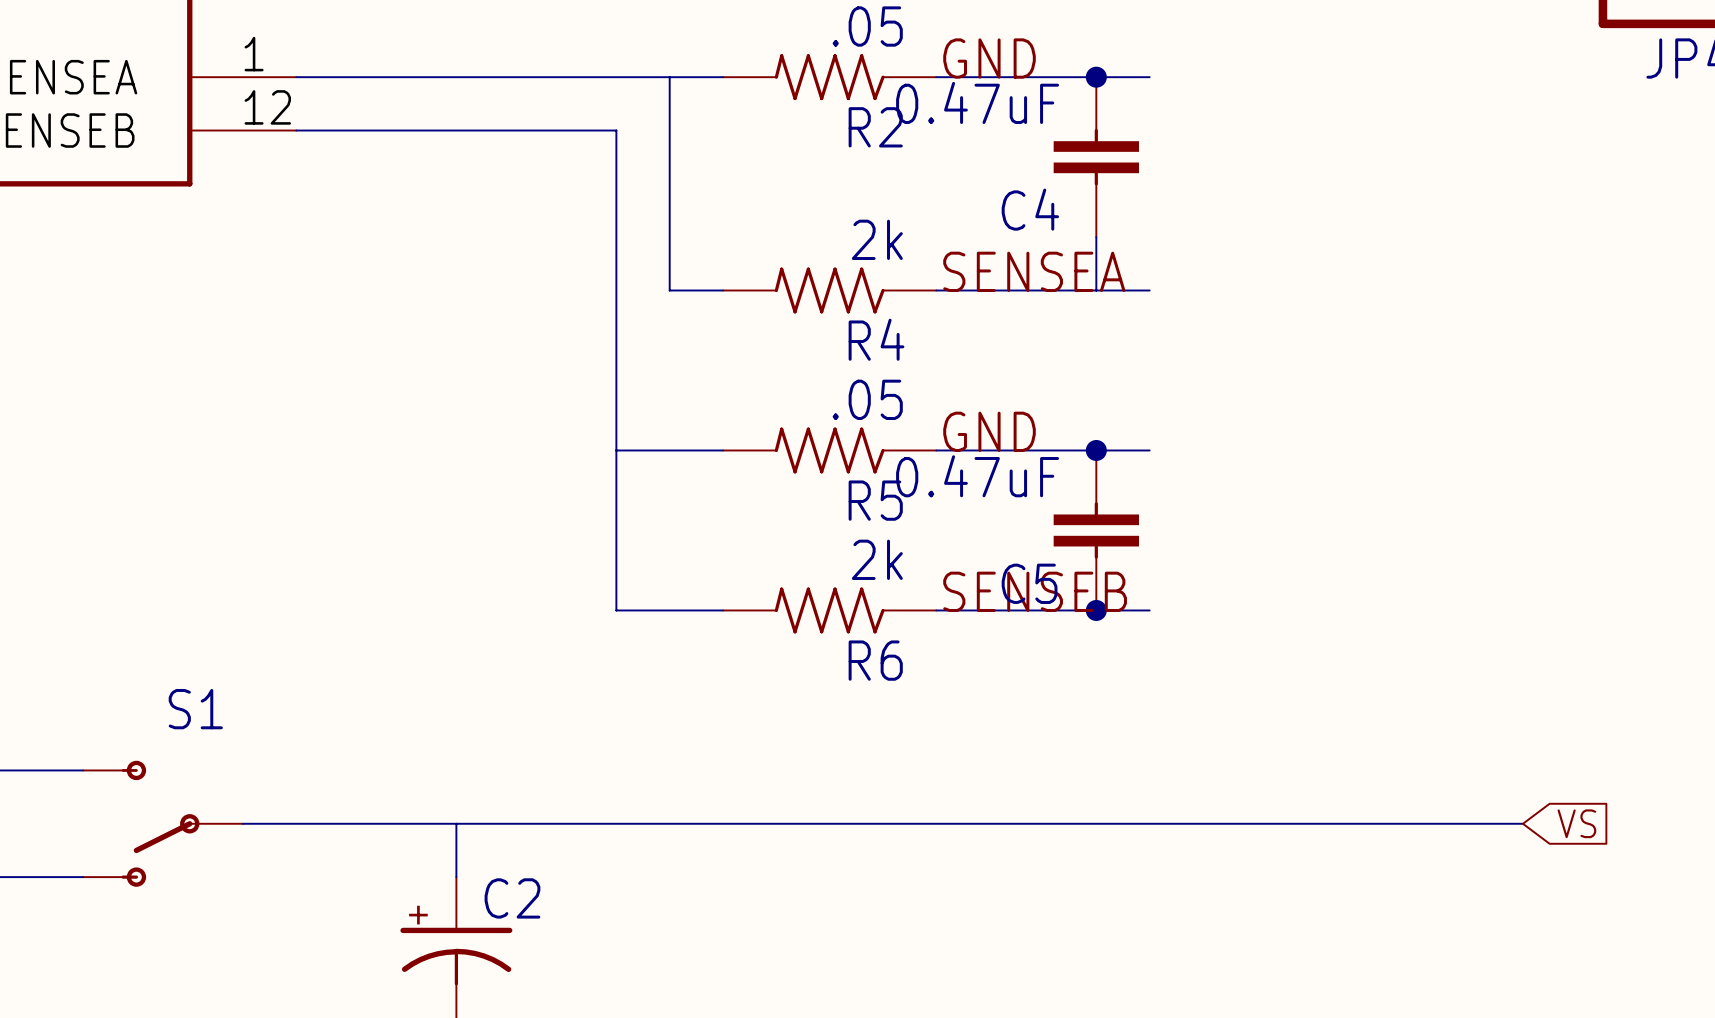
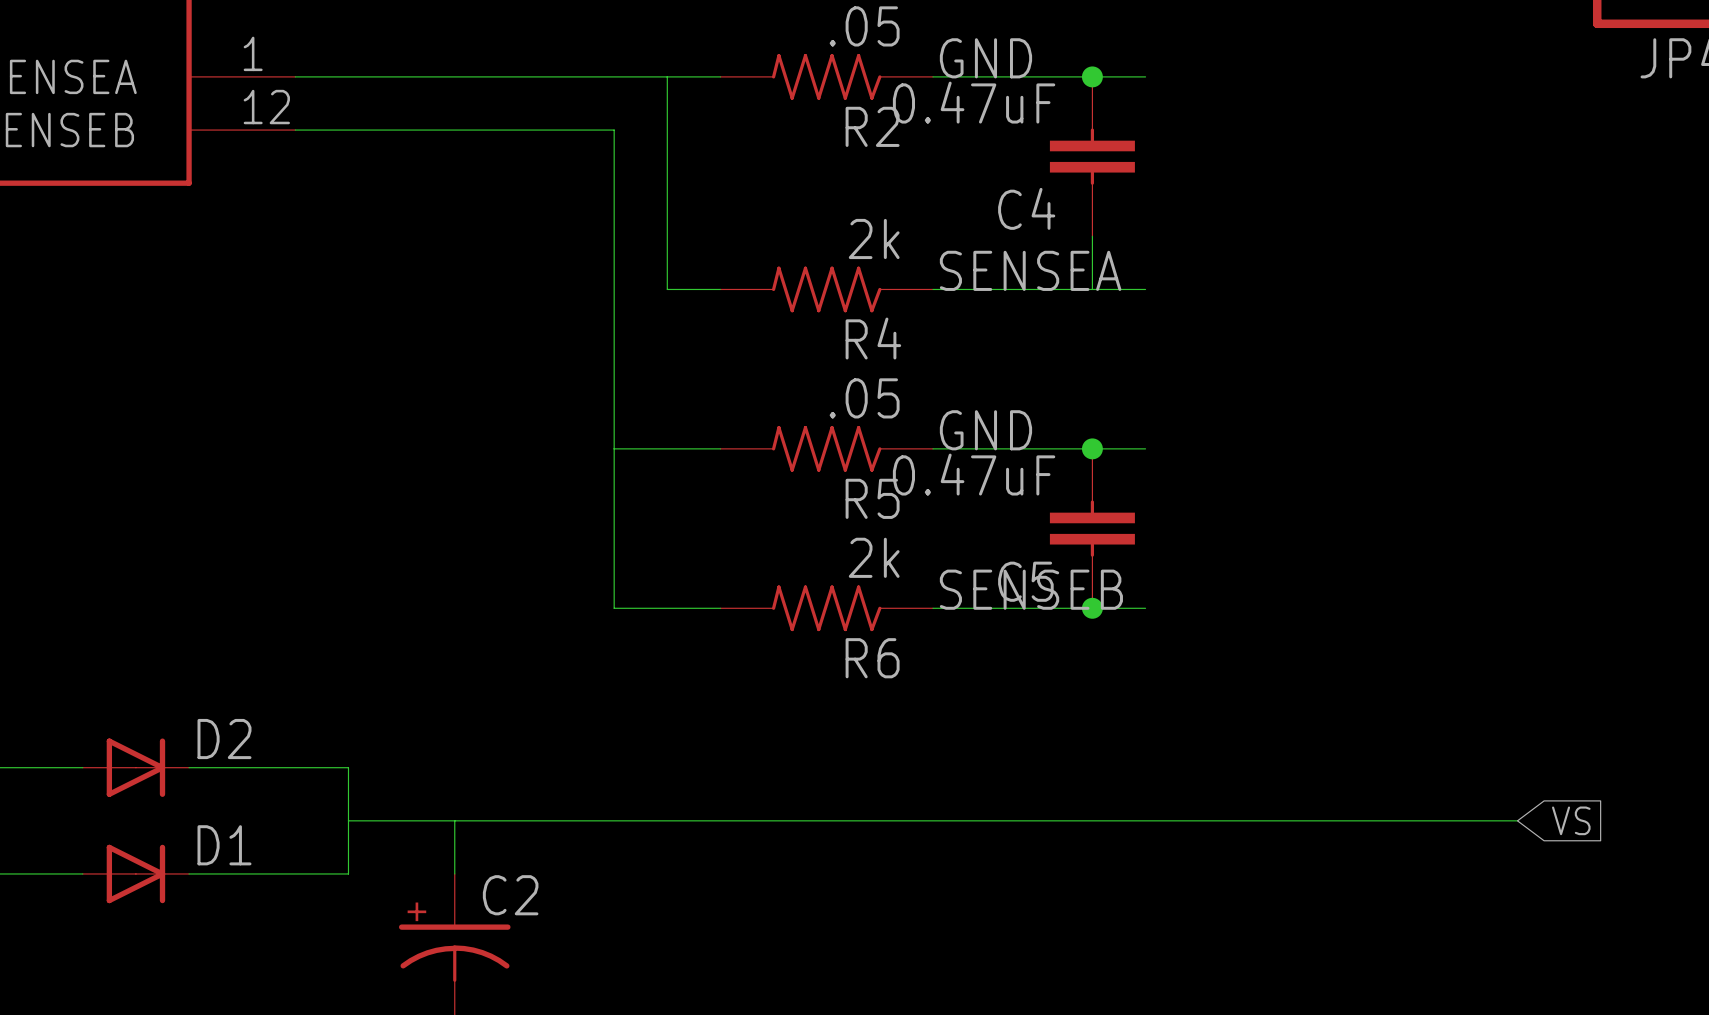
D2: none -> (135, 767)
wire: none -> (189, 767) (348, 767) (348, 873) (189, 873)
S1: (163, 823) -> none
wire: (243, 823) (349, 823) -> none
D1: none -> (135, 873)

